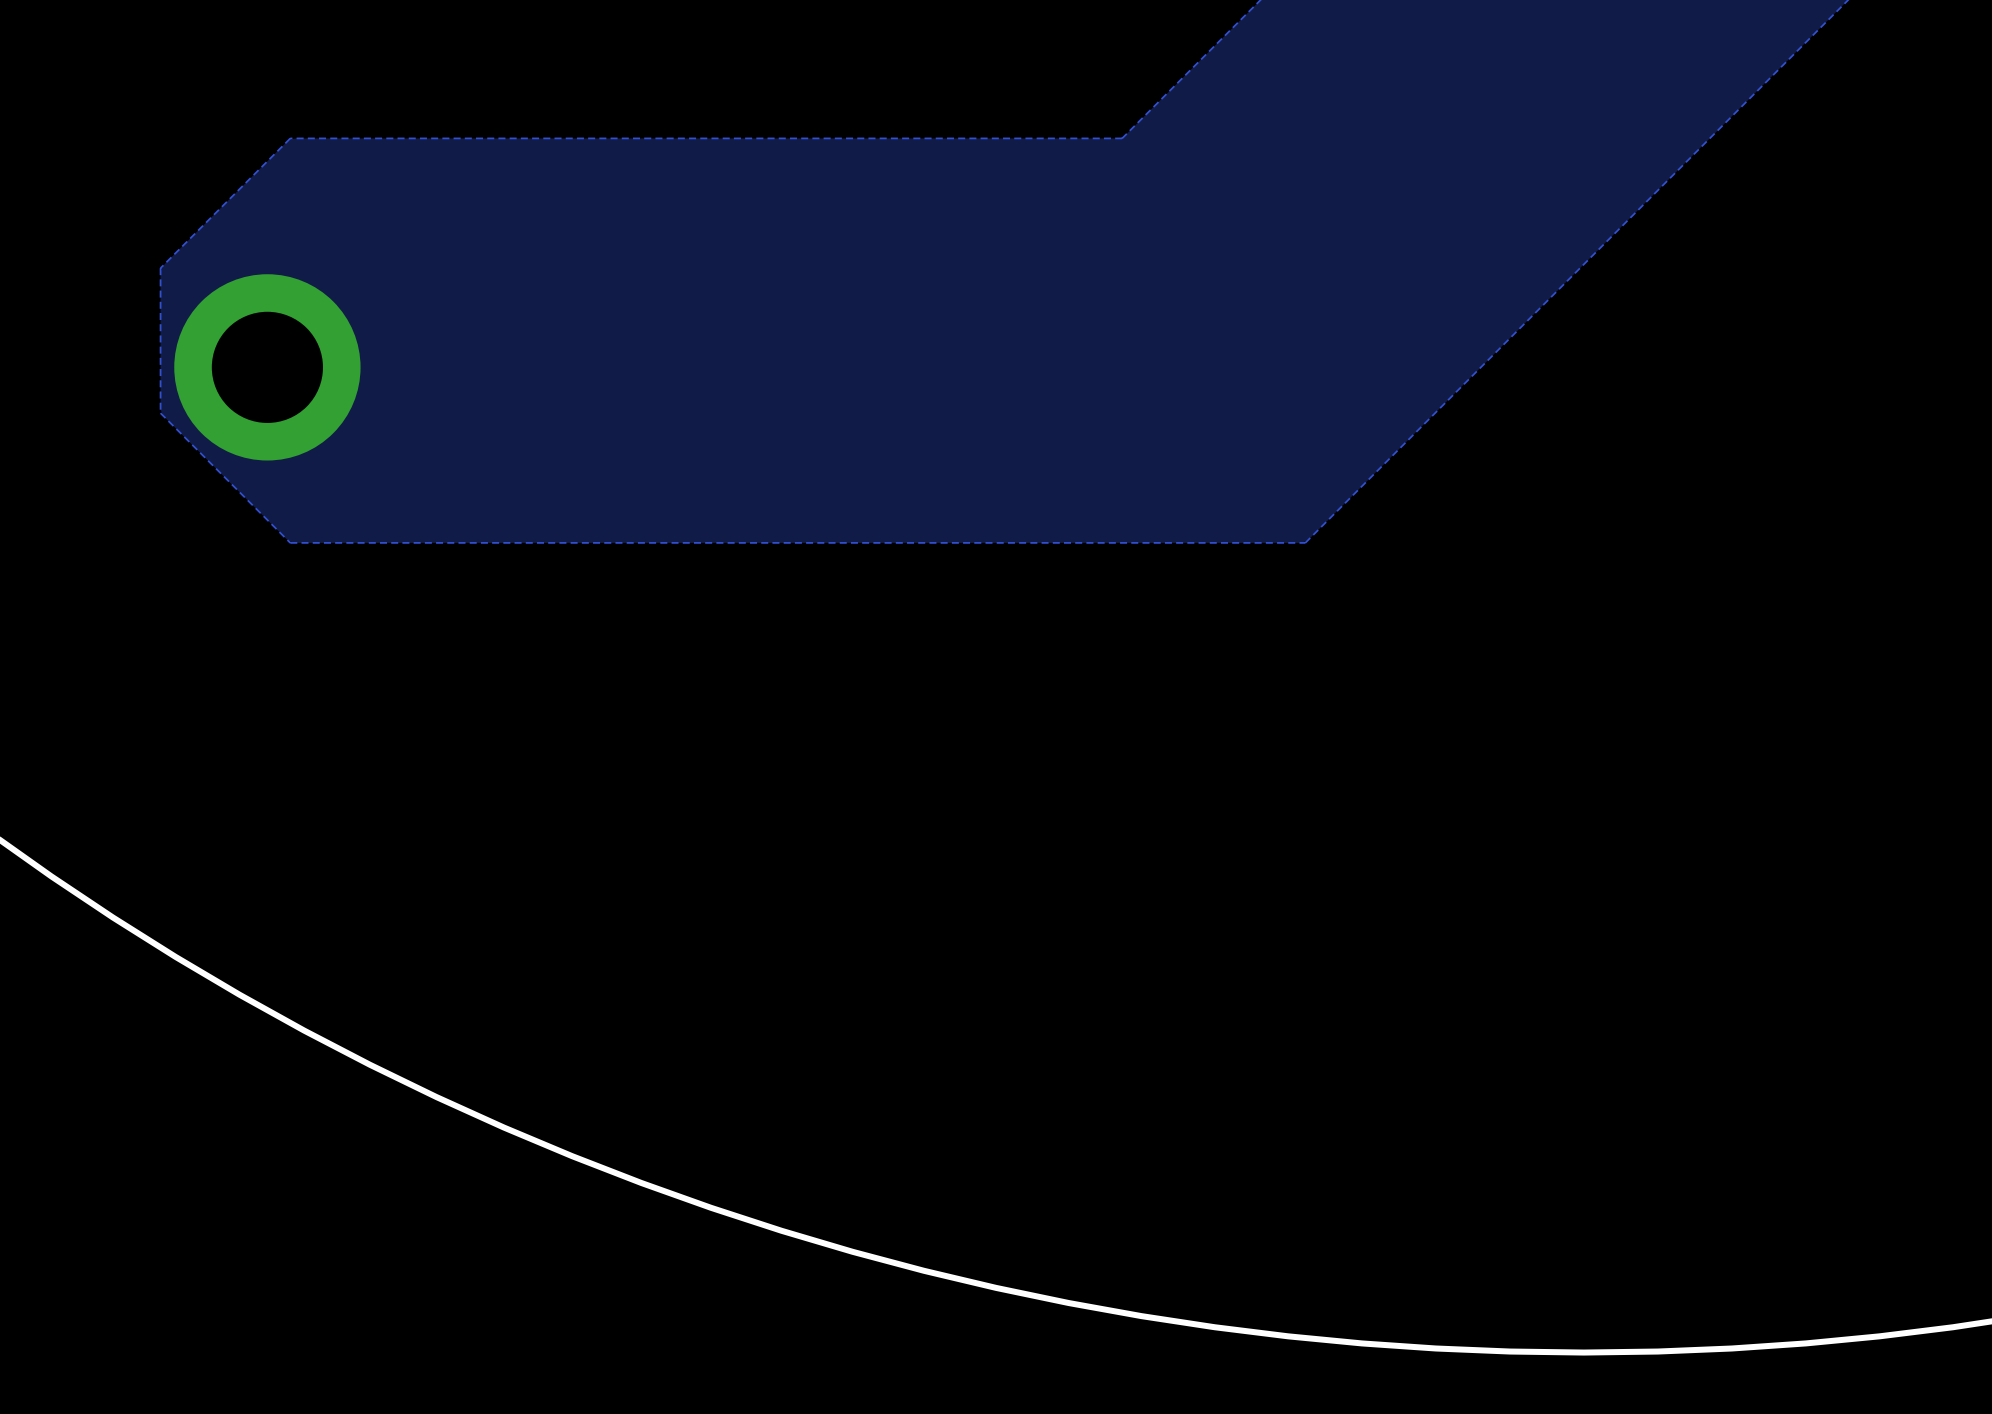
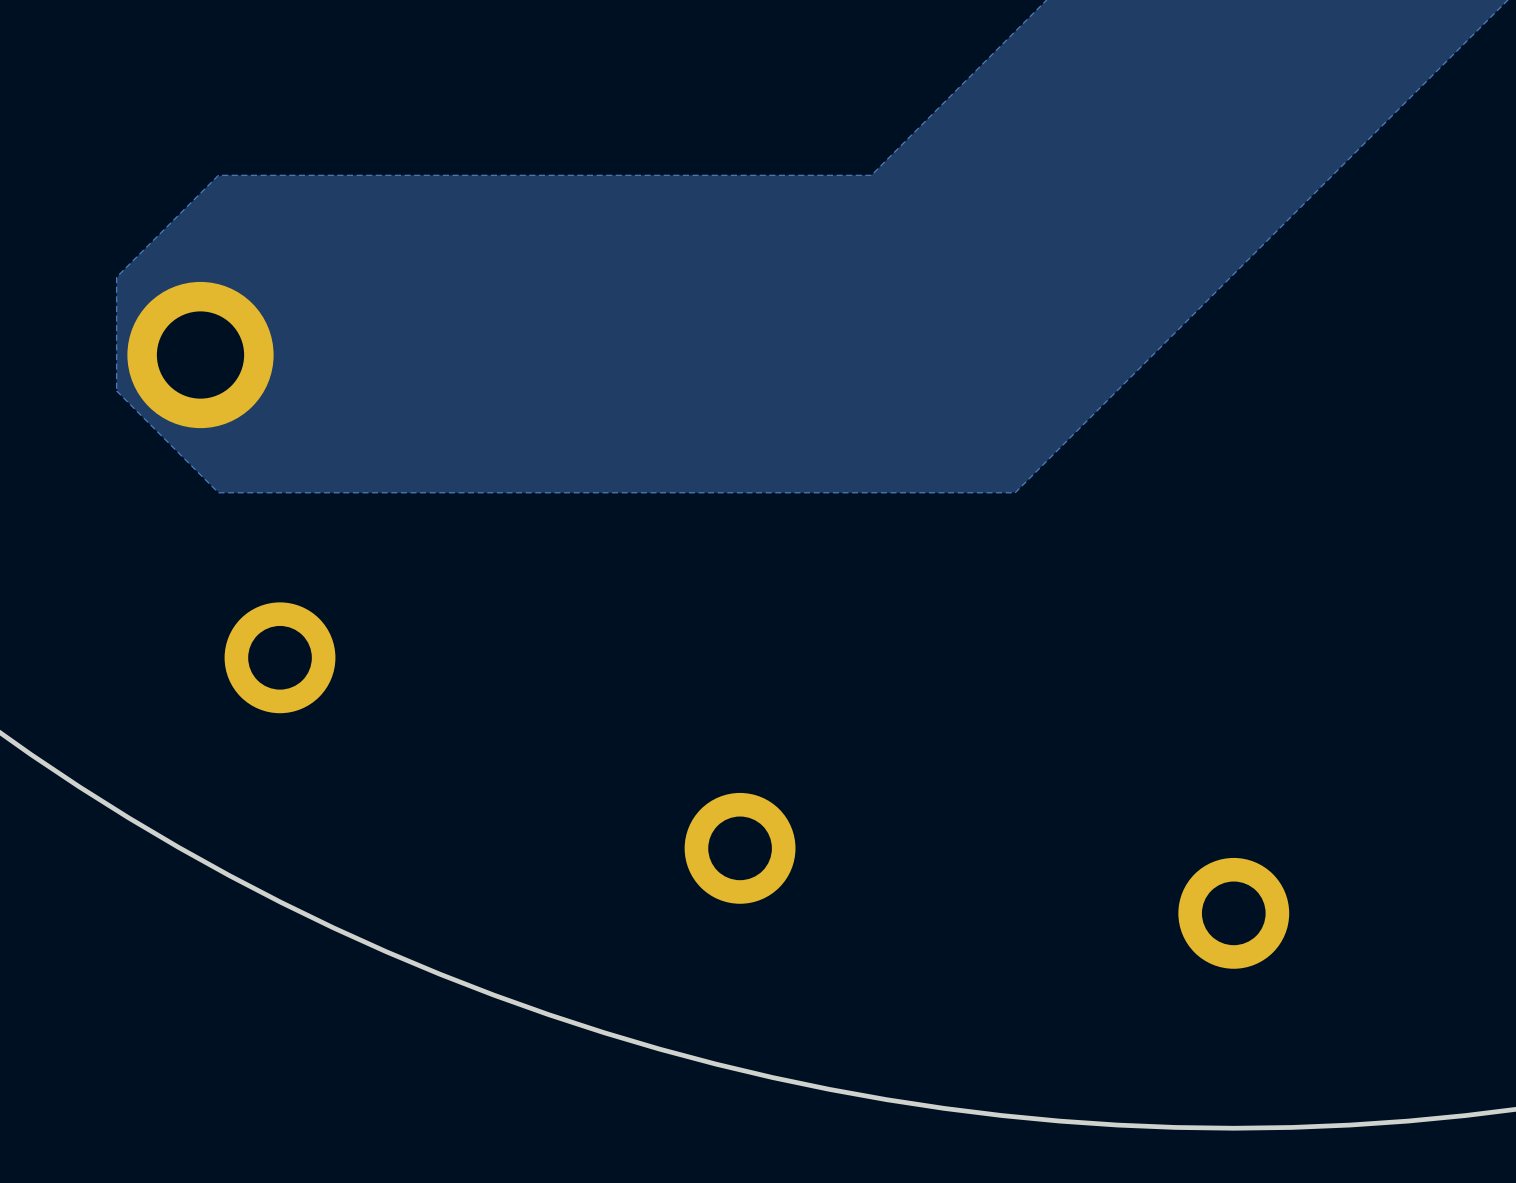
part: none -> (280, 657)
part: none -> (740, 848)
part: none -> (1233, 913)

